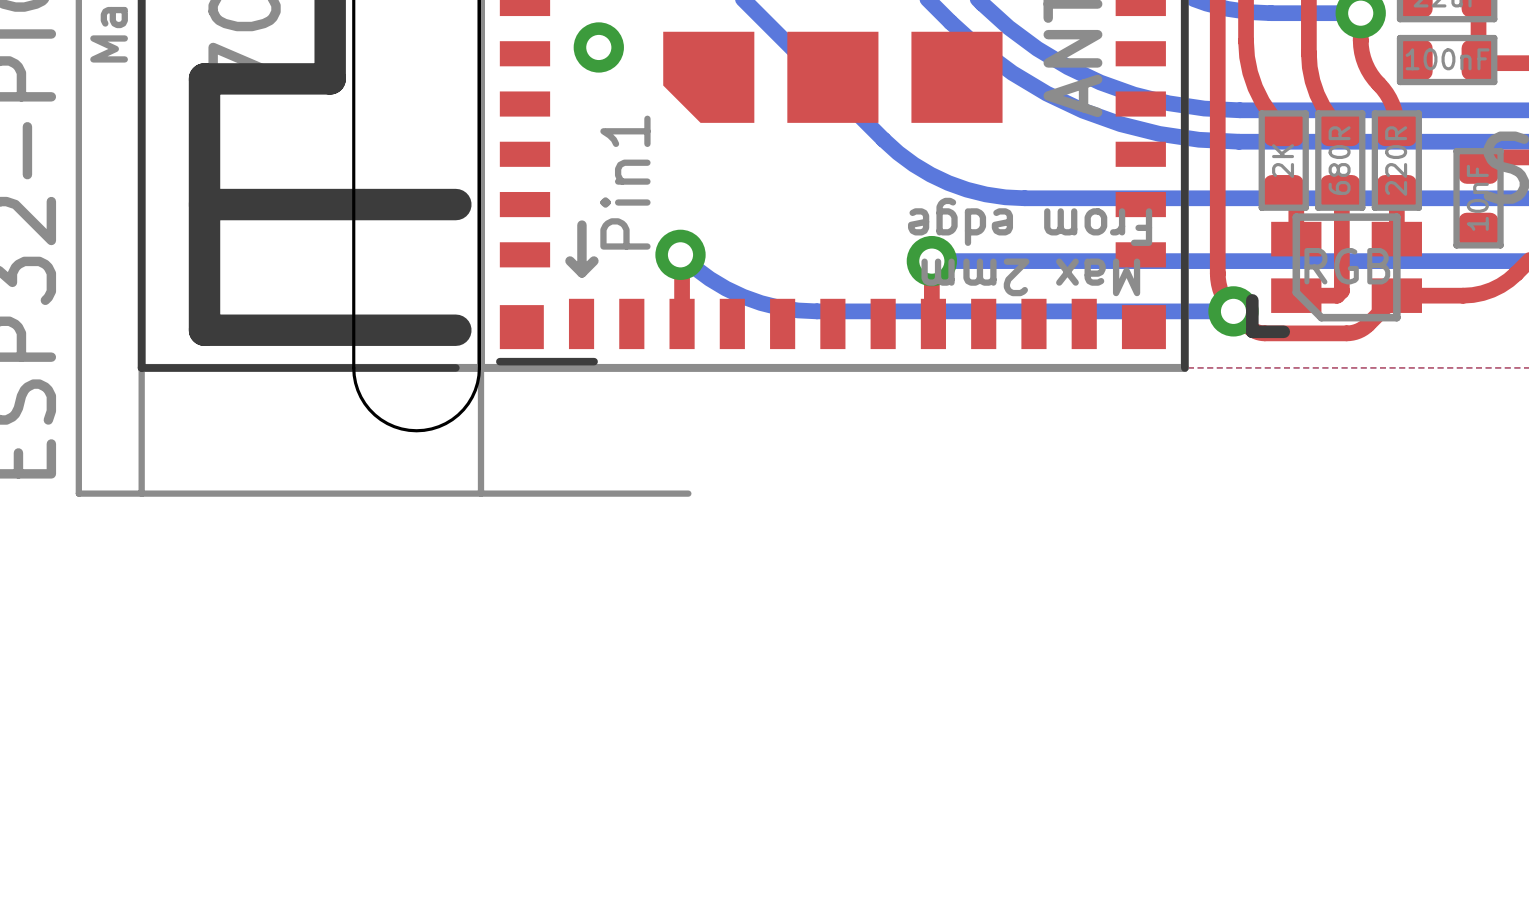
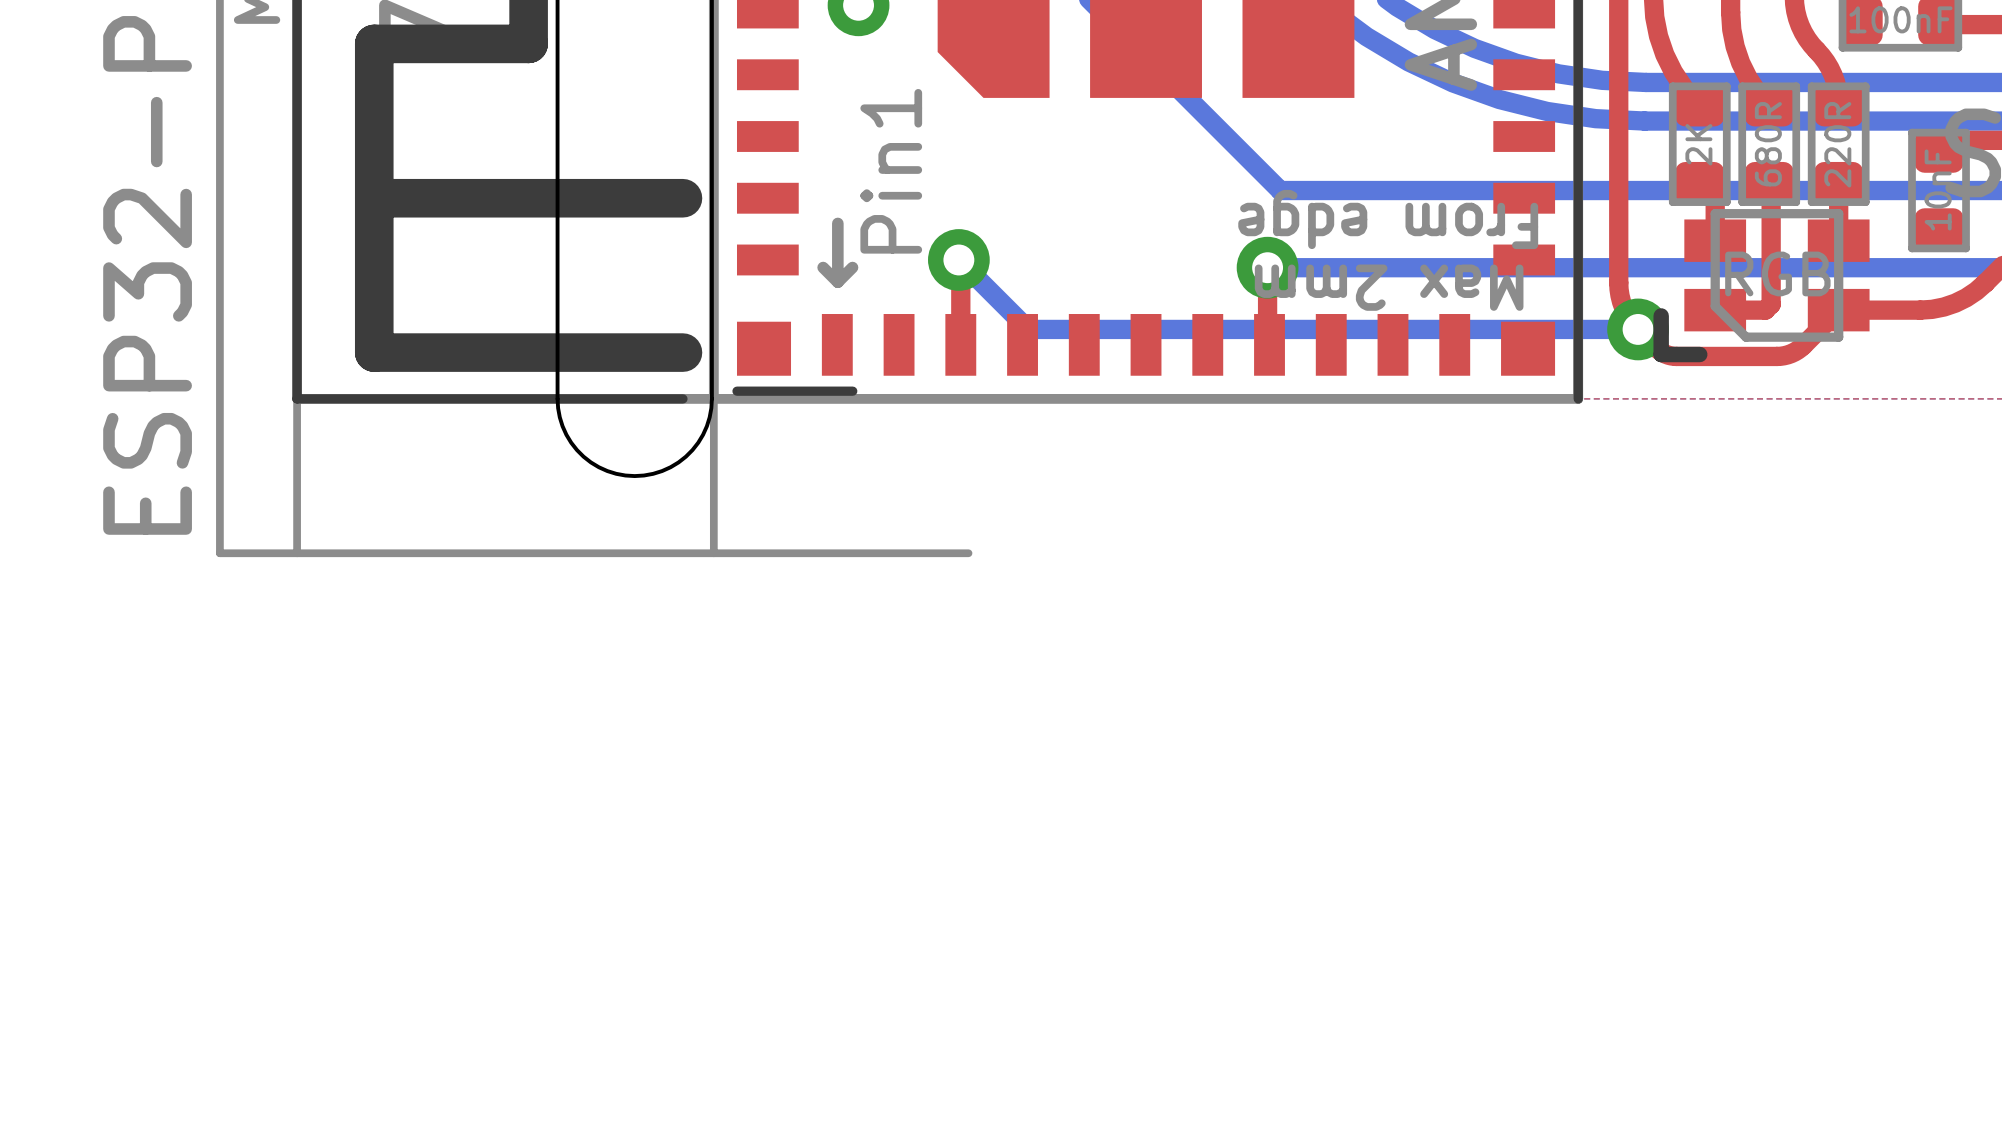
bottom track: (883, 139) (913, 164) (948, 183) (985, 194) (1024, 198) -> (1208, 118) (1280, 190) (1381, 190)
bottom track: (680, 254) (709, 278) (743, 296) (779, 307) (817, 311) -> (958, 259) (1028, 329) (1126, 329)

